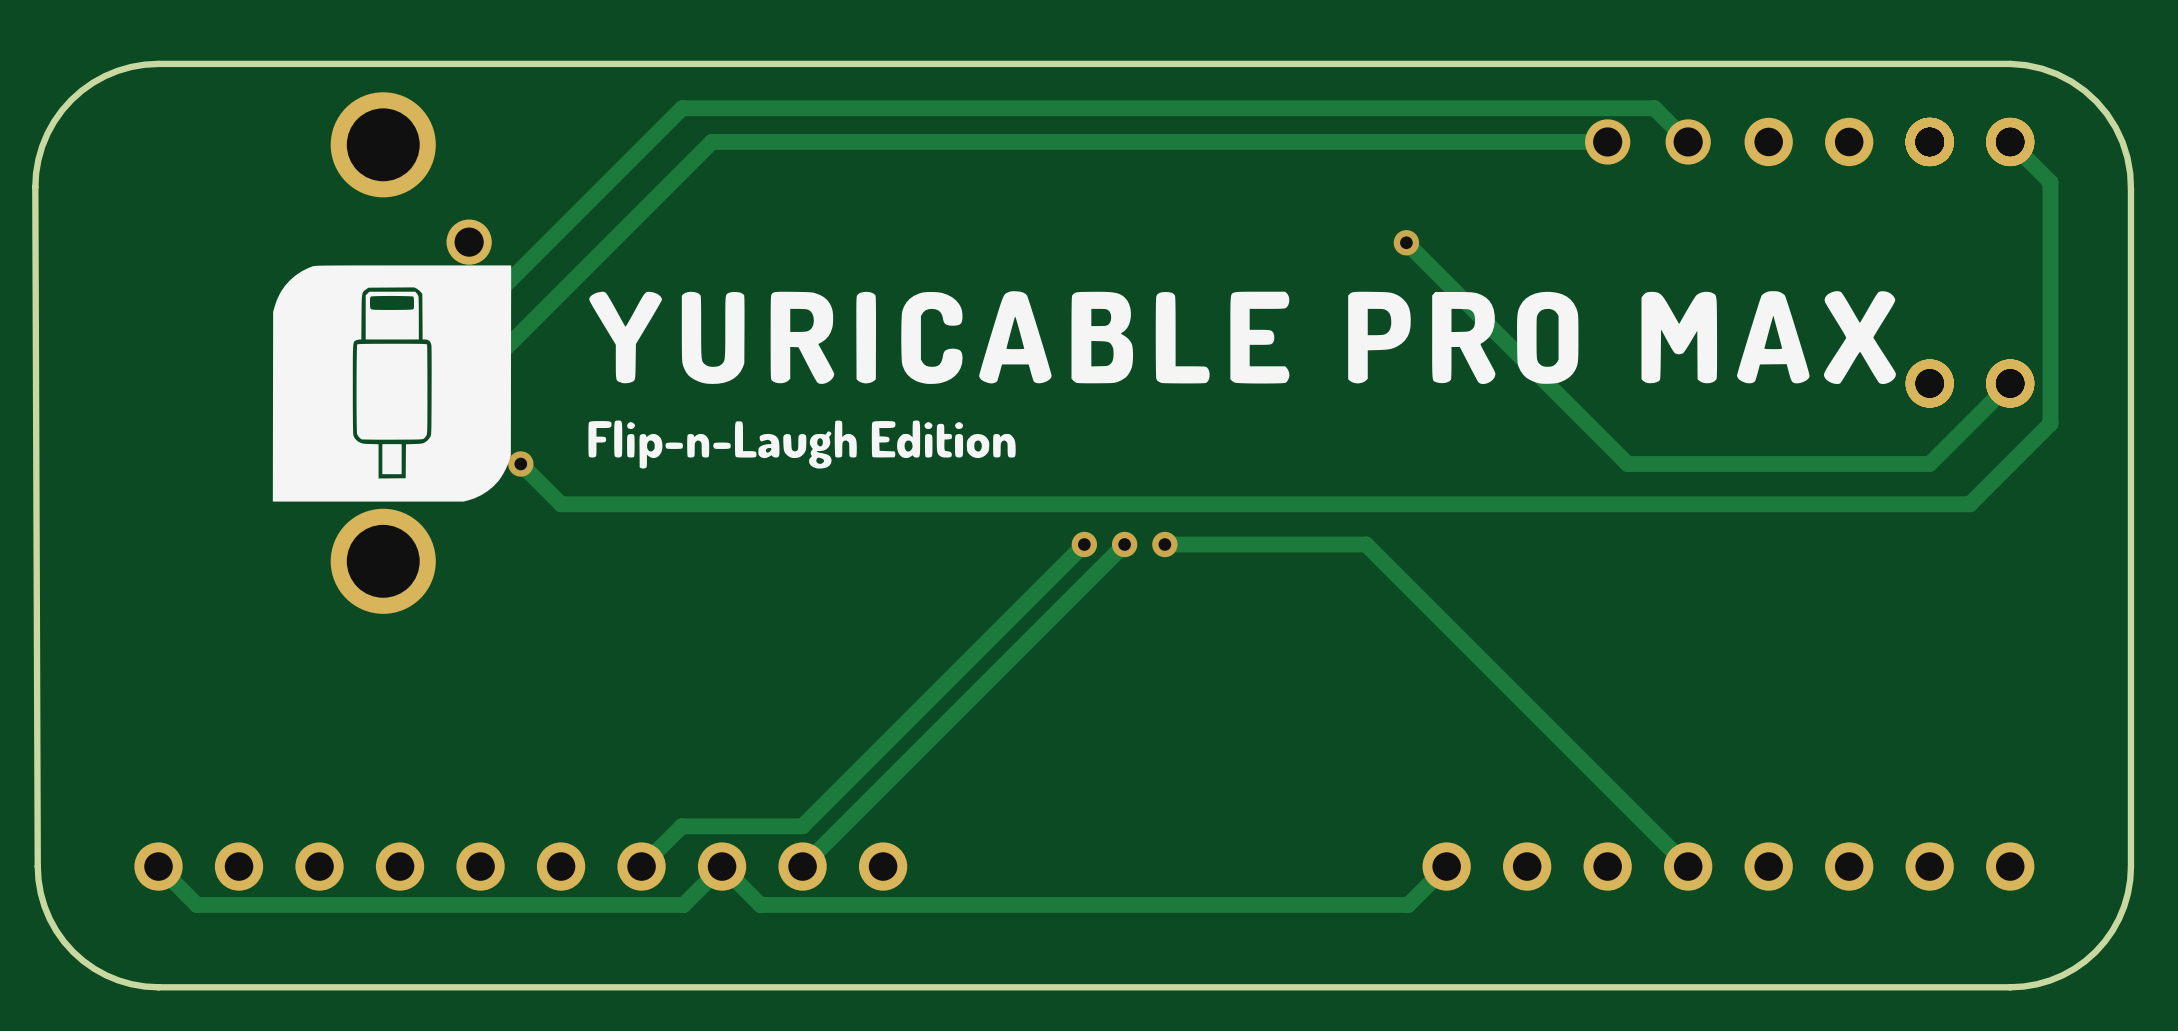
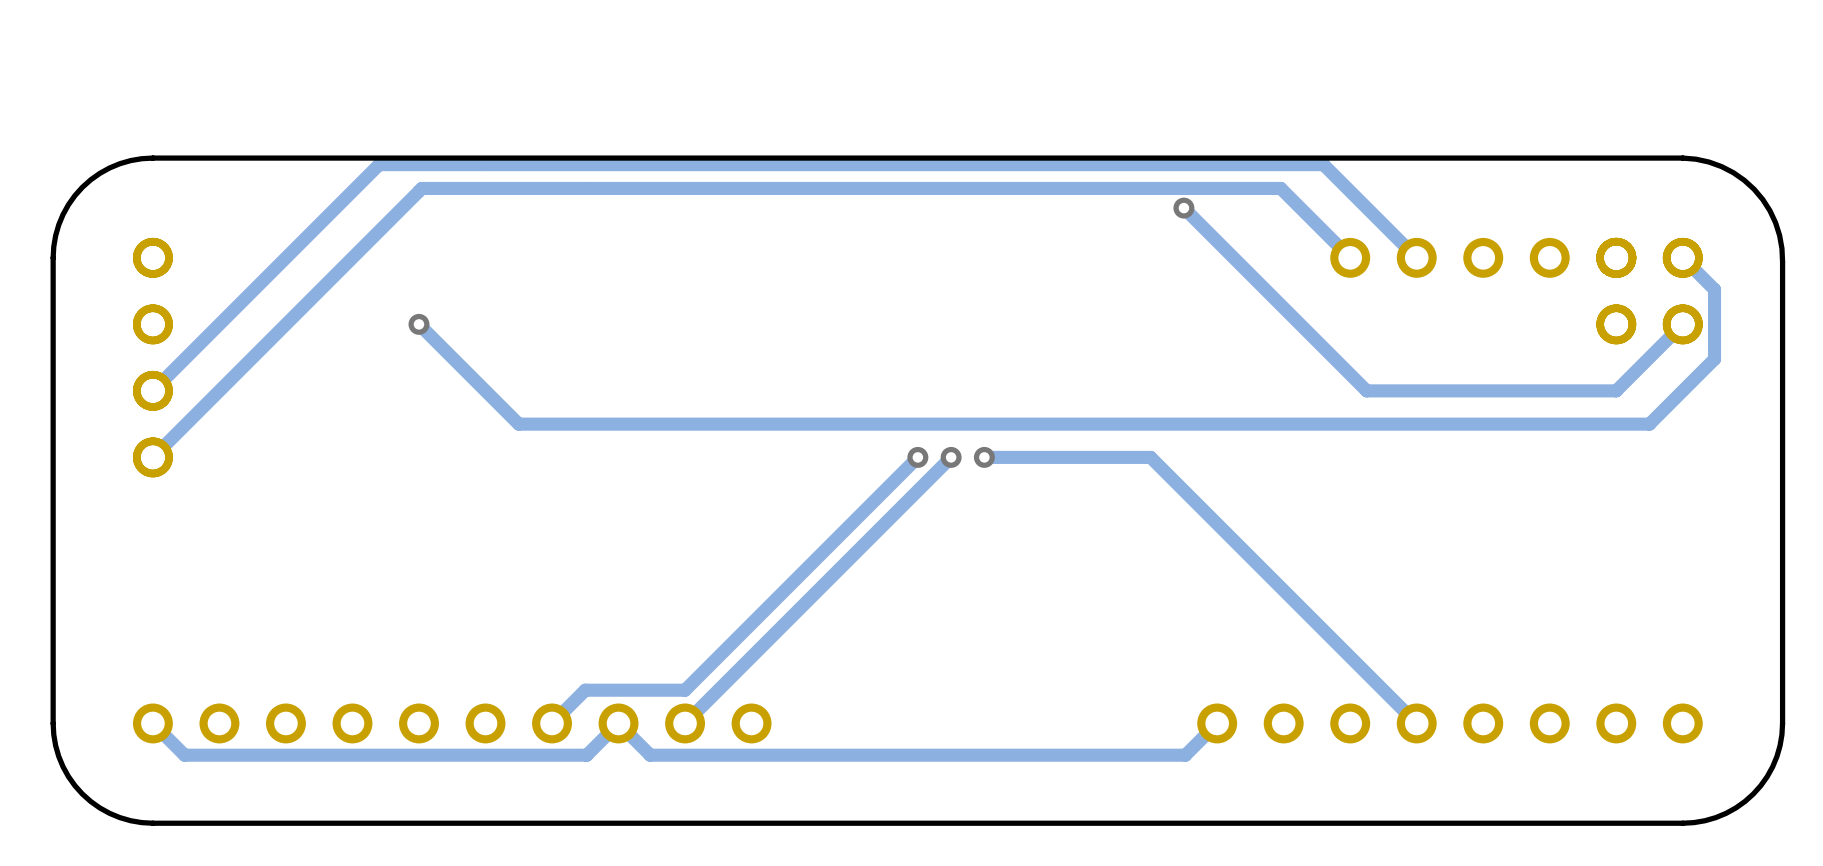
track: (1607, 141) (711, 141) (469, 384) -> none
part: (1607, 141) -> none
track: (1688, 141) (1654, 108) (682, 108) (469, 321) -> none
part: (1688, 141) -> none
part: (1768, 141) -> none
part: (1849, 141) -> none
part: (1929, 141) -> none
track: (2010, 141) (2050, 182) (2050, 423) (2048, 425) -> (1682, 257) (1714, 289) (1714, 359)
part: (2010, 141) -> none
drawing: [272, 265, 1896, 502] -> none
part: none -> (152, 257)
track: none -> (1350, 257) (1280, 188) (421, 188) (152, 457)
part: none -> (1350, 257)
track: none -> (1416, 257) (1323, 164) (379, 164) (152, 390)
part: none -> (1416, 257)
part: none -> (1483, 257)
part: none -> (1549, 257)
part: none -> (1616, 257)
part: none -> (1682, 257)
board edge: (2130, 307) (2130, 173) (2122, 142) (2107, 114) (2084, 90) (2057, 74) (2026, 65) (158, 63) (131, 66) (105, 76) (92, 82) (71, 99) (54, 121) (47, 133) (38, 159) (36, 173) (37, 866) -> (1782, 261) (1781, 248) (1775, 222) (1769, 210) (1754, 189) (1744, 180) (1721, 166) (1696, 159) (1682, 158) (152, 158) (130, 160) (99, 173) (74, 195) (58, 224) (53, 246) (53, 723)
part: (411, 353) -> none
part: none -> (152, 324)
part: none -> (152, 390)
track: (520, 464) (561, 504) (601, 504) -> (418, 324) (518, 424)
via position: (520, 464) -> (418, 324)
part: none -> (152, 457)

